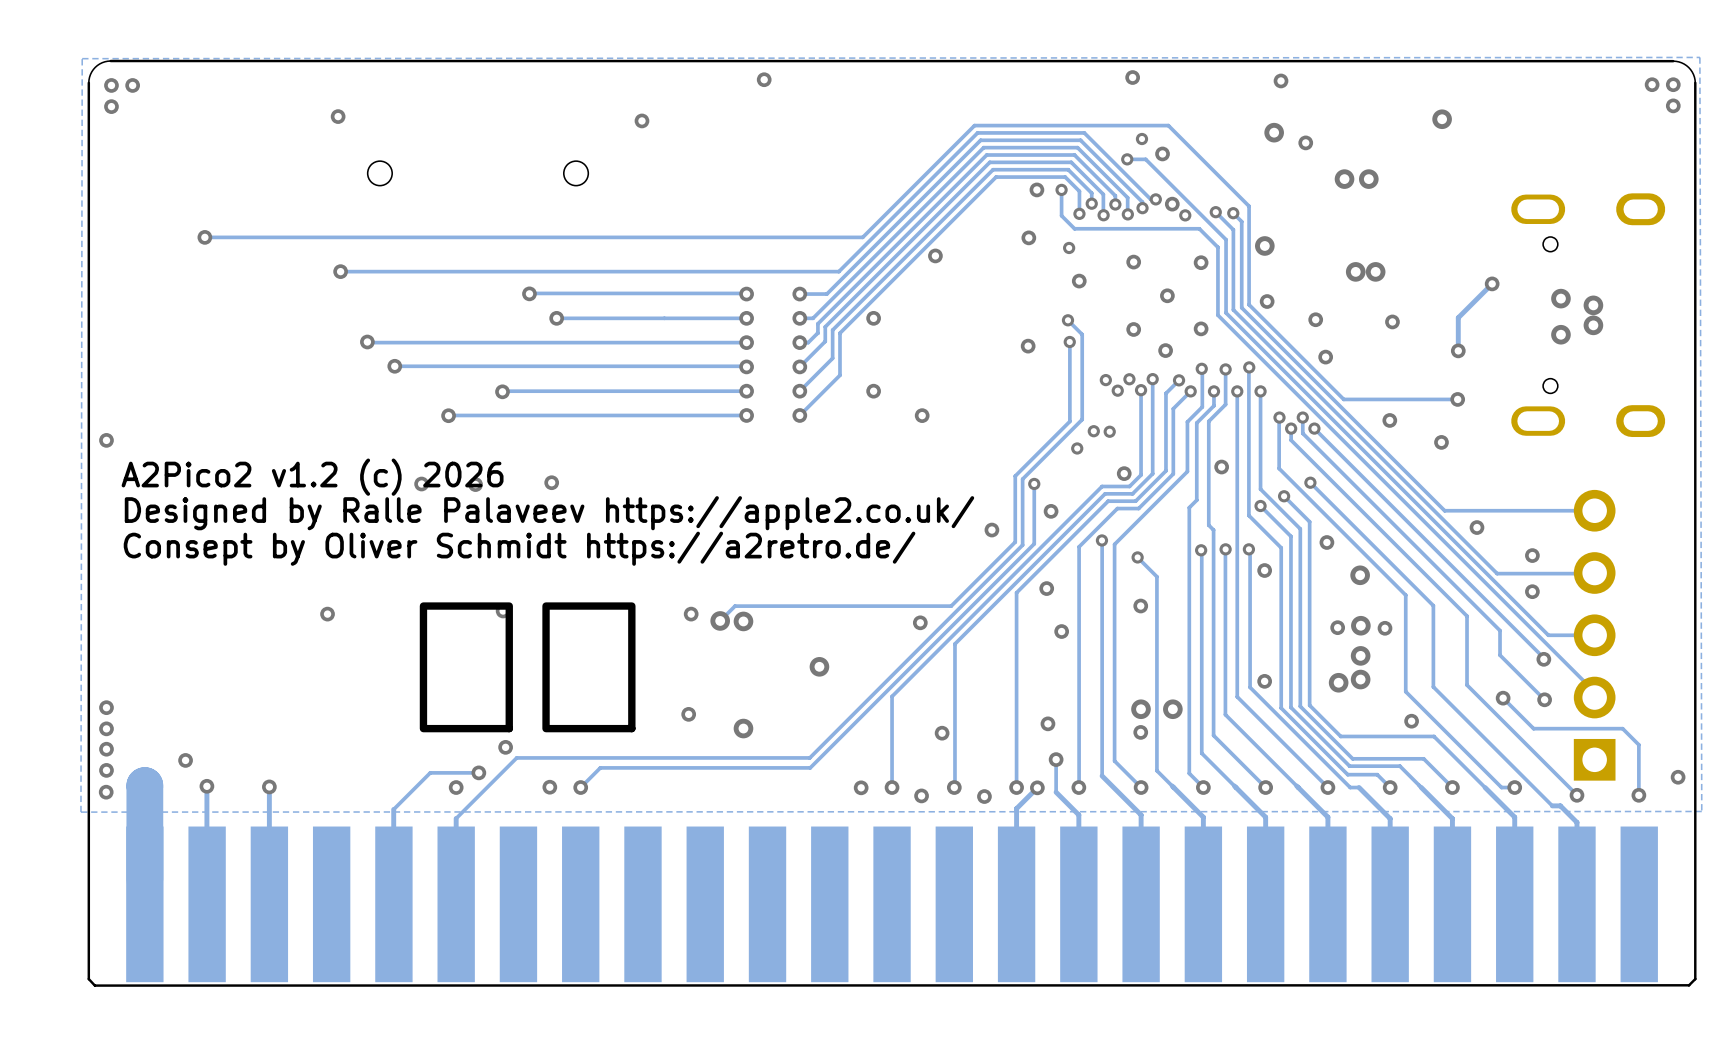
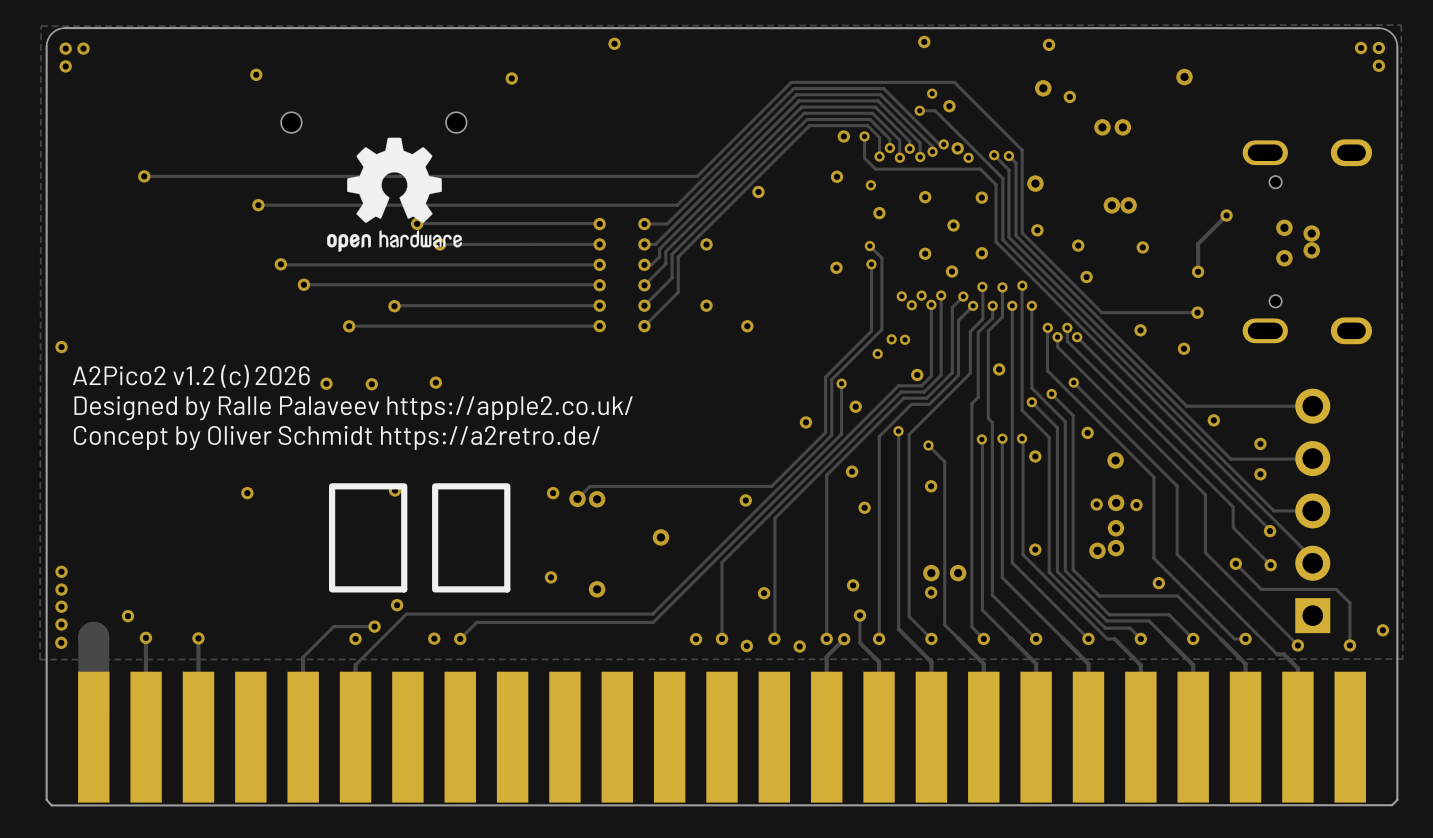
drawing: none -> [327, 137, 462, 252]
text: Consept by Oliver Schmidt https://a2retro.de/ (519, 548) -> Concept by Oliver Schmidt https://a2retro.de/ (336, 438)

